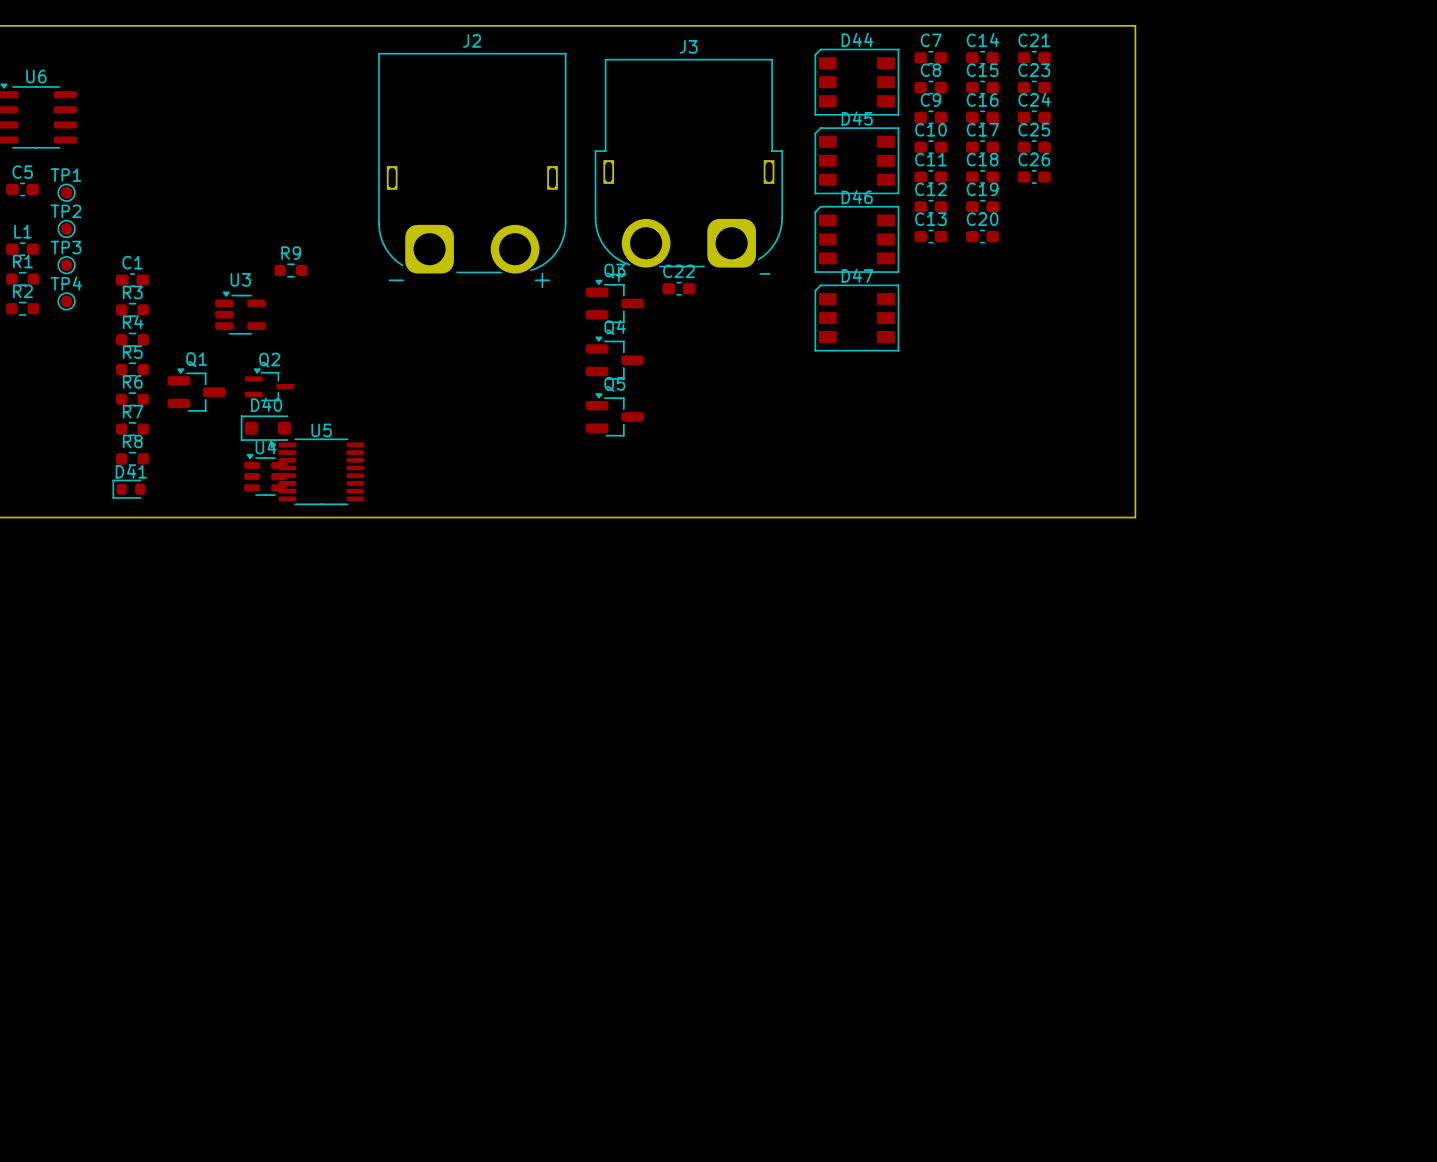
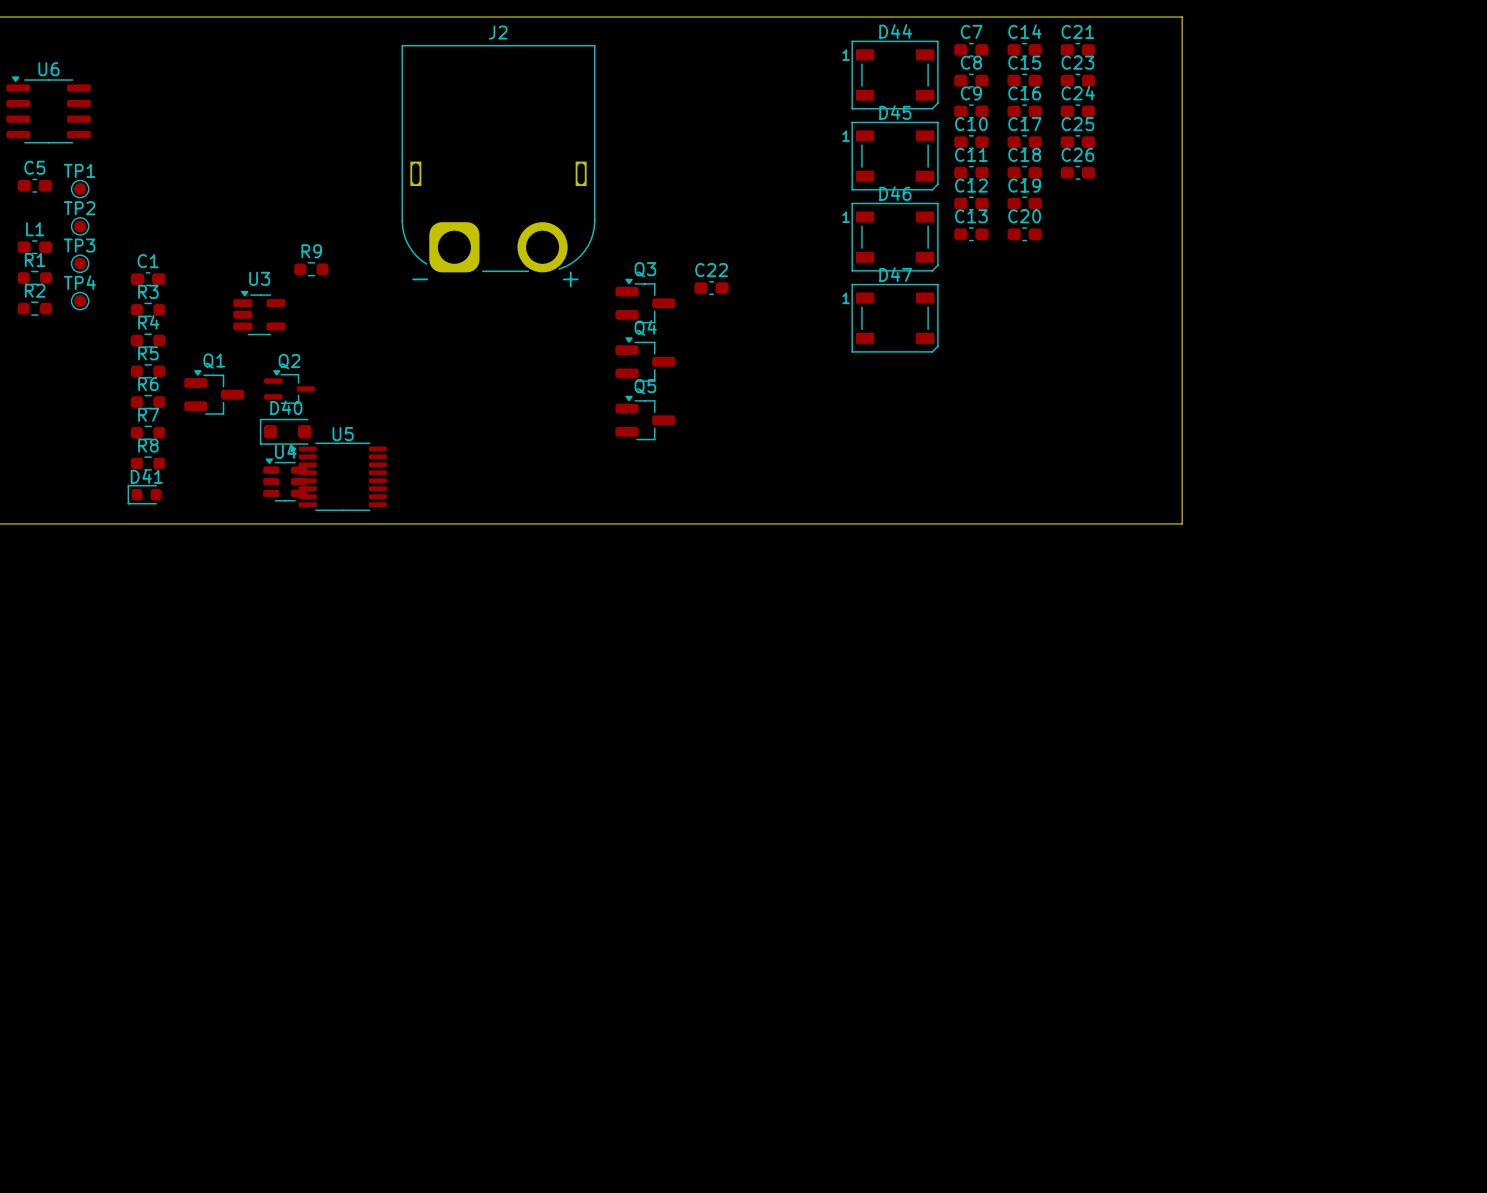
D44 footprint: [814, 48, 900, 116] -> [851, 40, 939, 110]
D45 footprint: [814, 127, 900, 195] -> [851, 121, 939, 191]
J3: (688, 163) -> none
D46 footprint: [814, 206, 900, 273] -> [851, 202, 939, 272]
D47 footprint: [814, 284, 900, 352] -> [851, 283, 939, 353]

